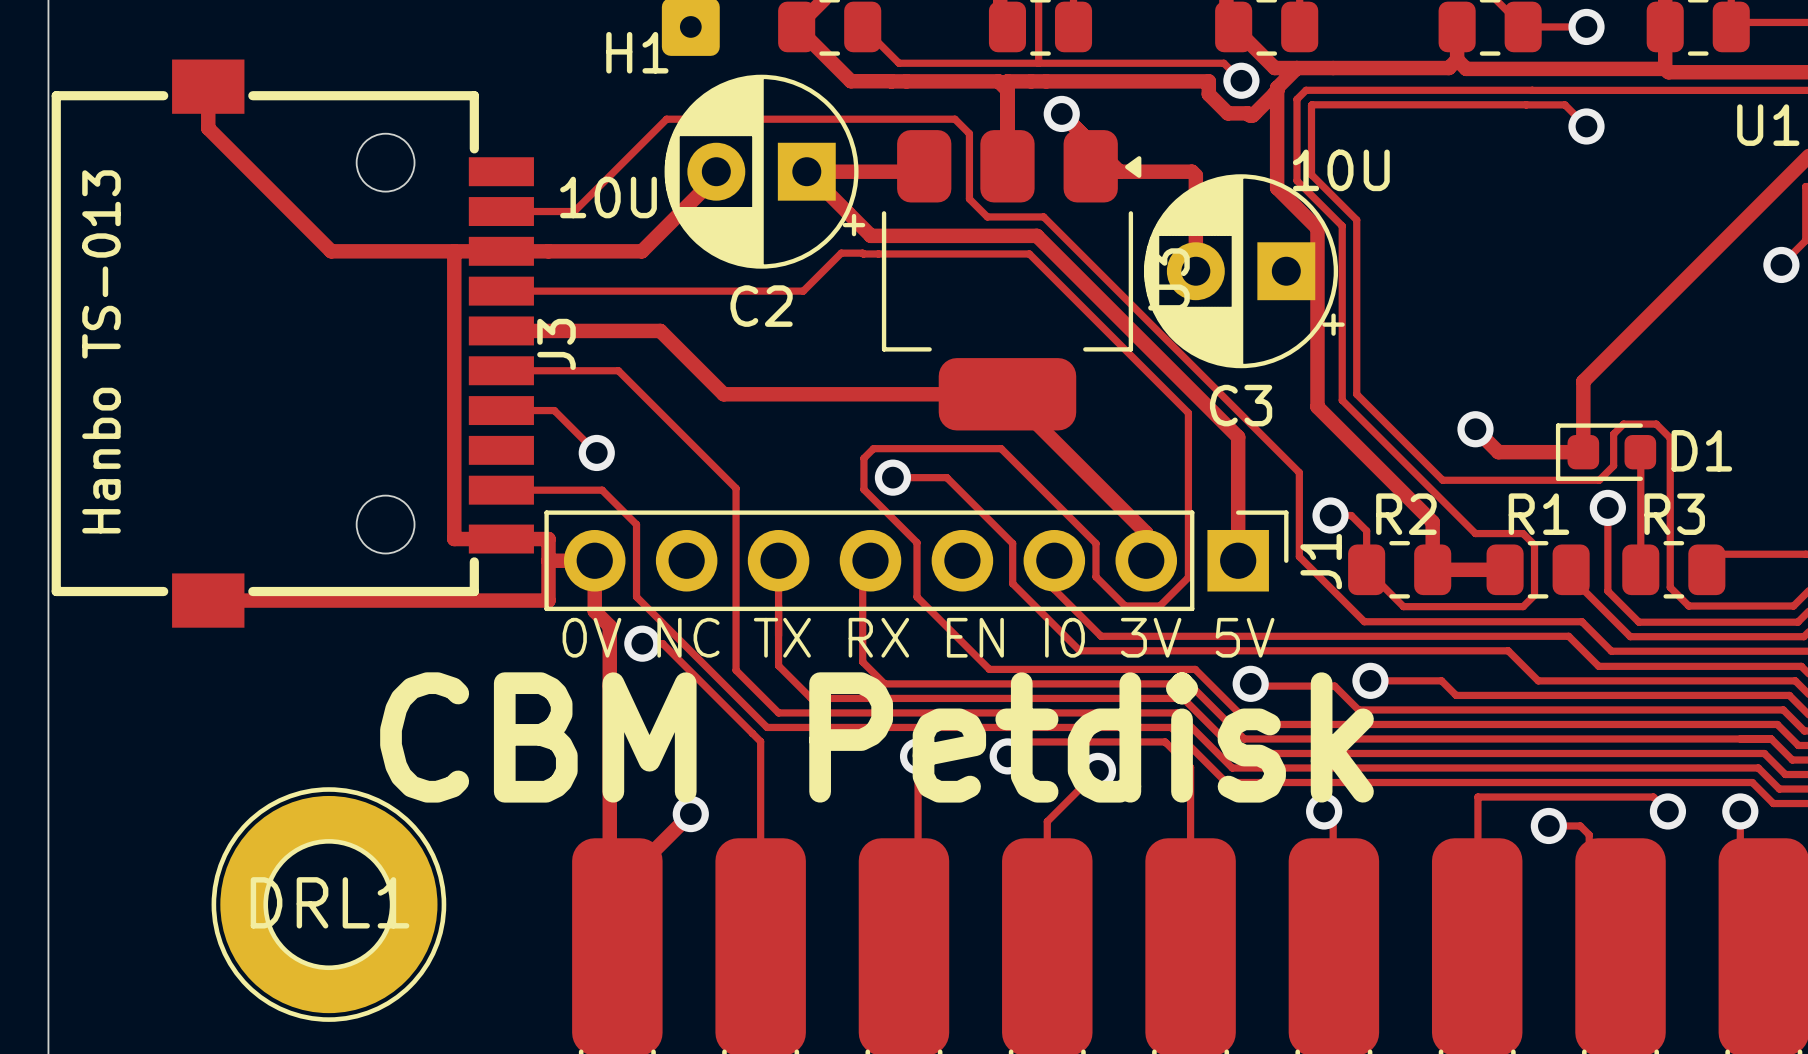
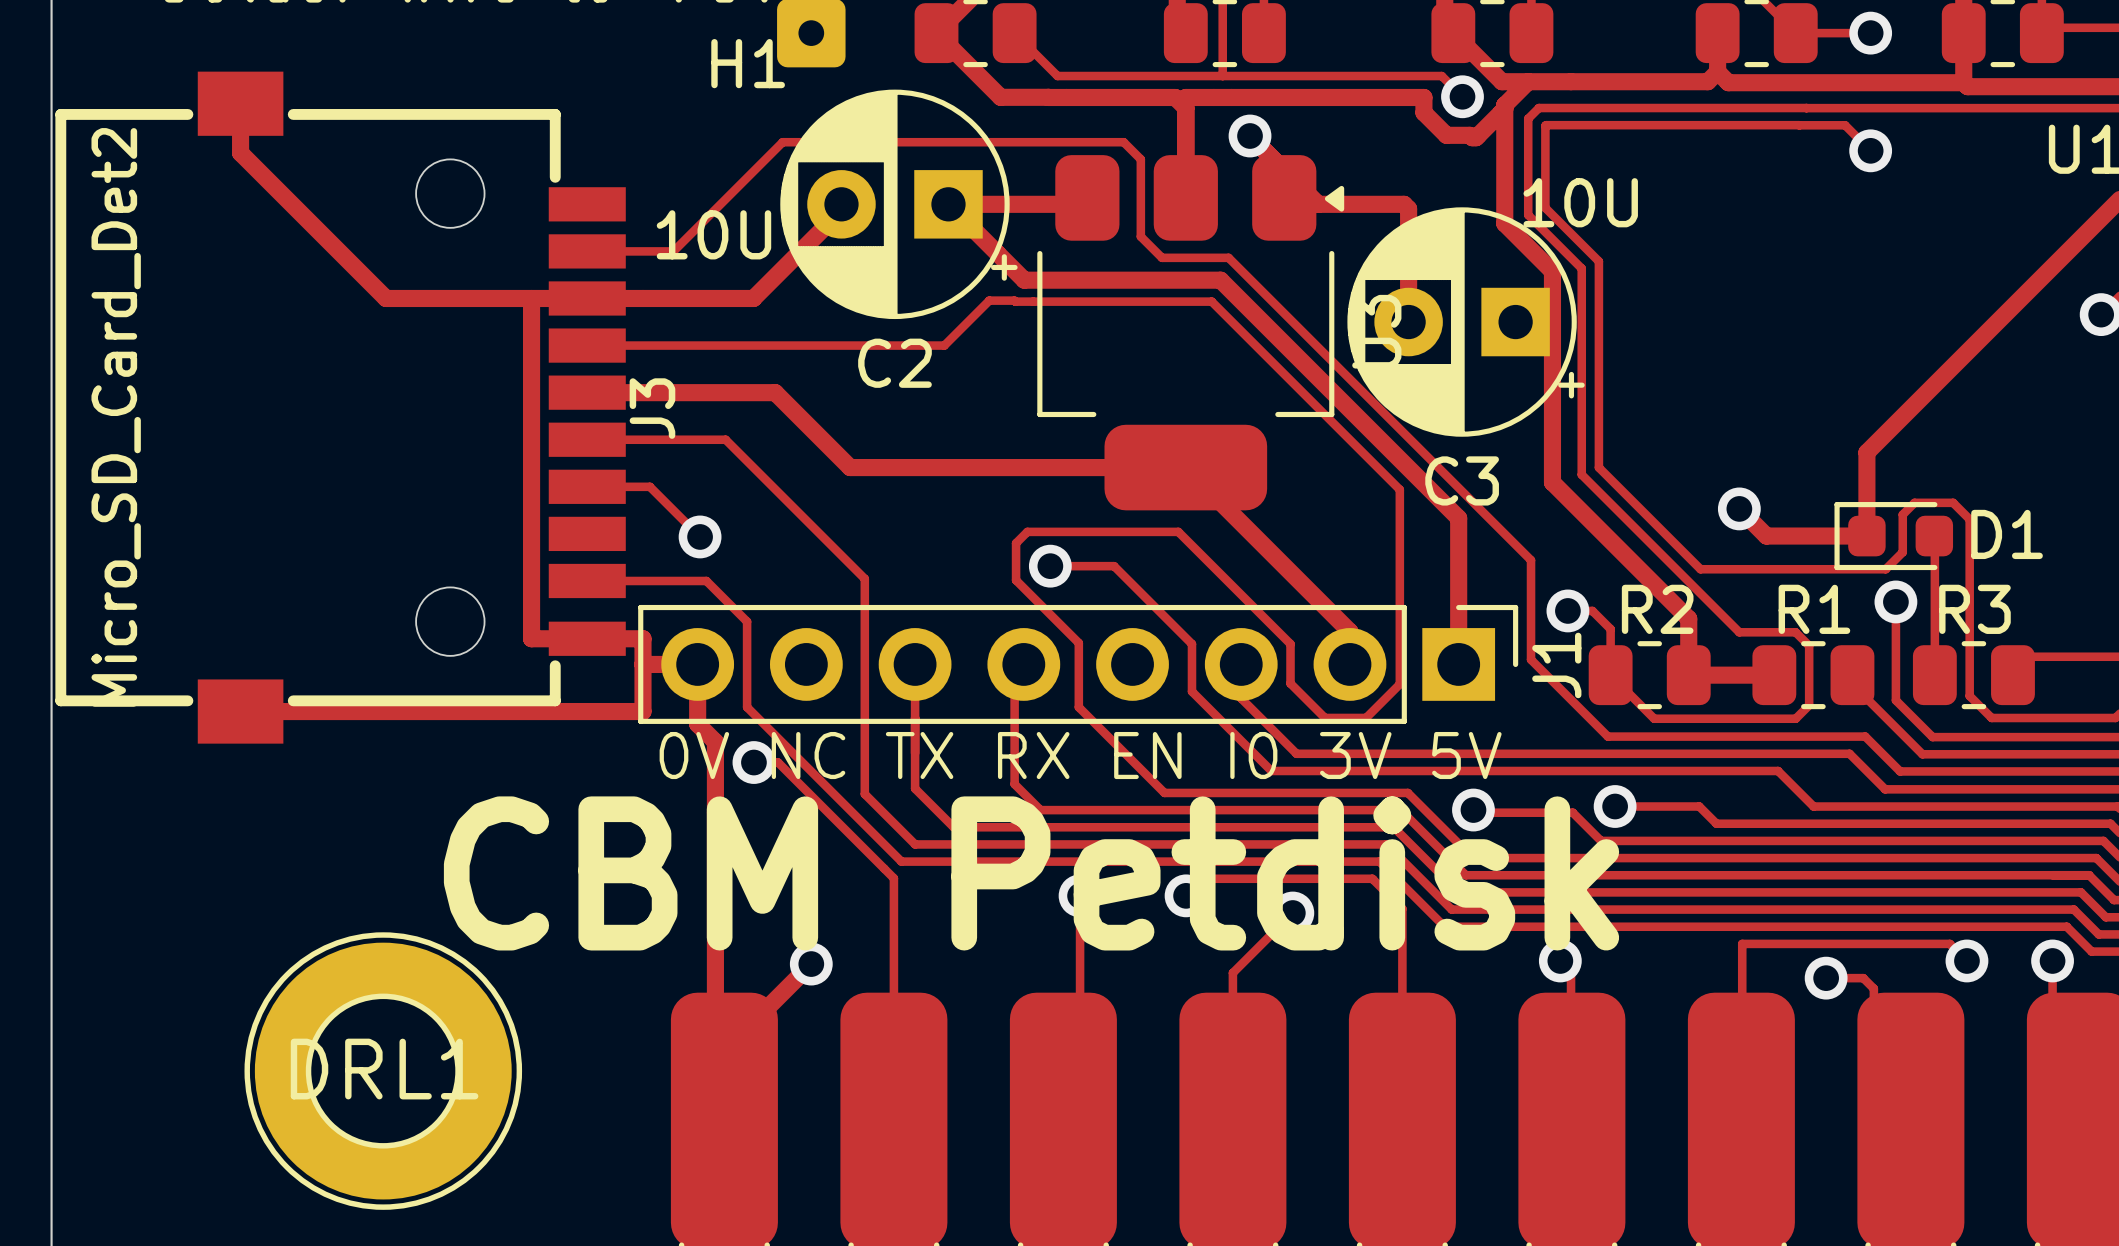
J3 value: Hanbo TS-013 (101, 351) -> Micro_SD_Card_Det2 (116, 417)

